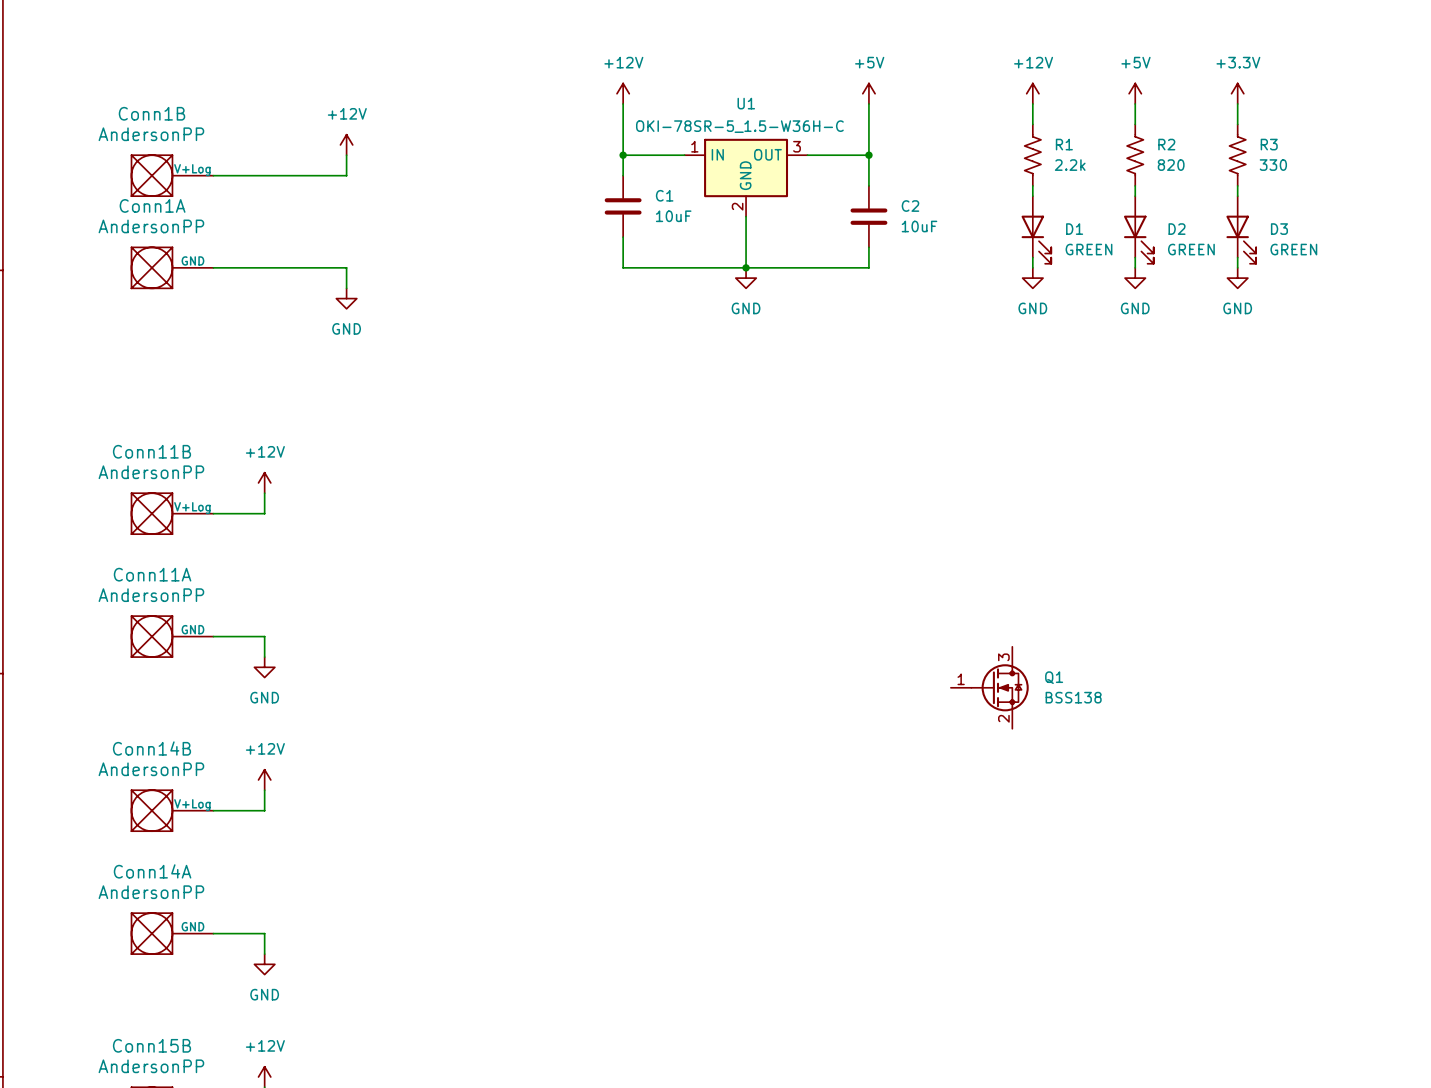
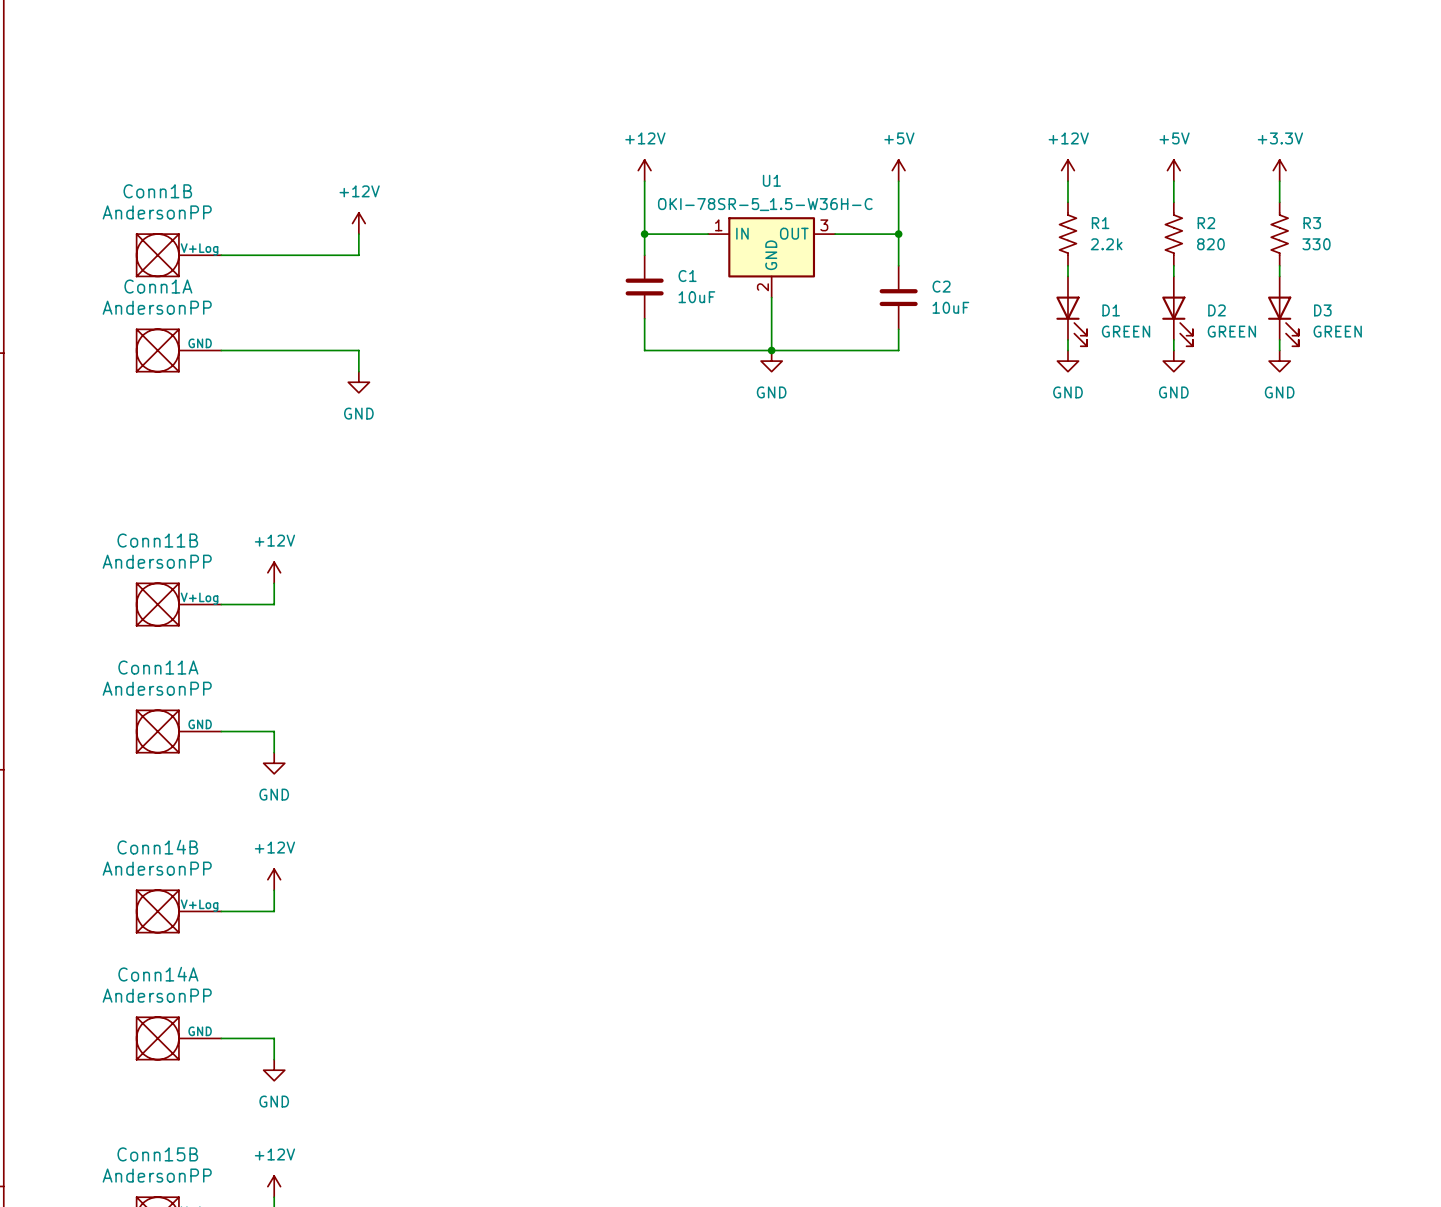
Q1: BSS138 (989, 687) -> none

